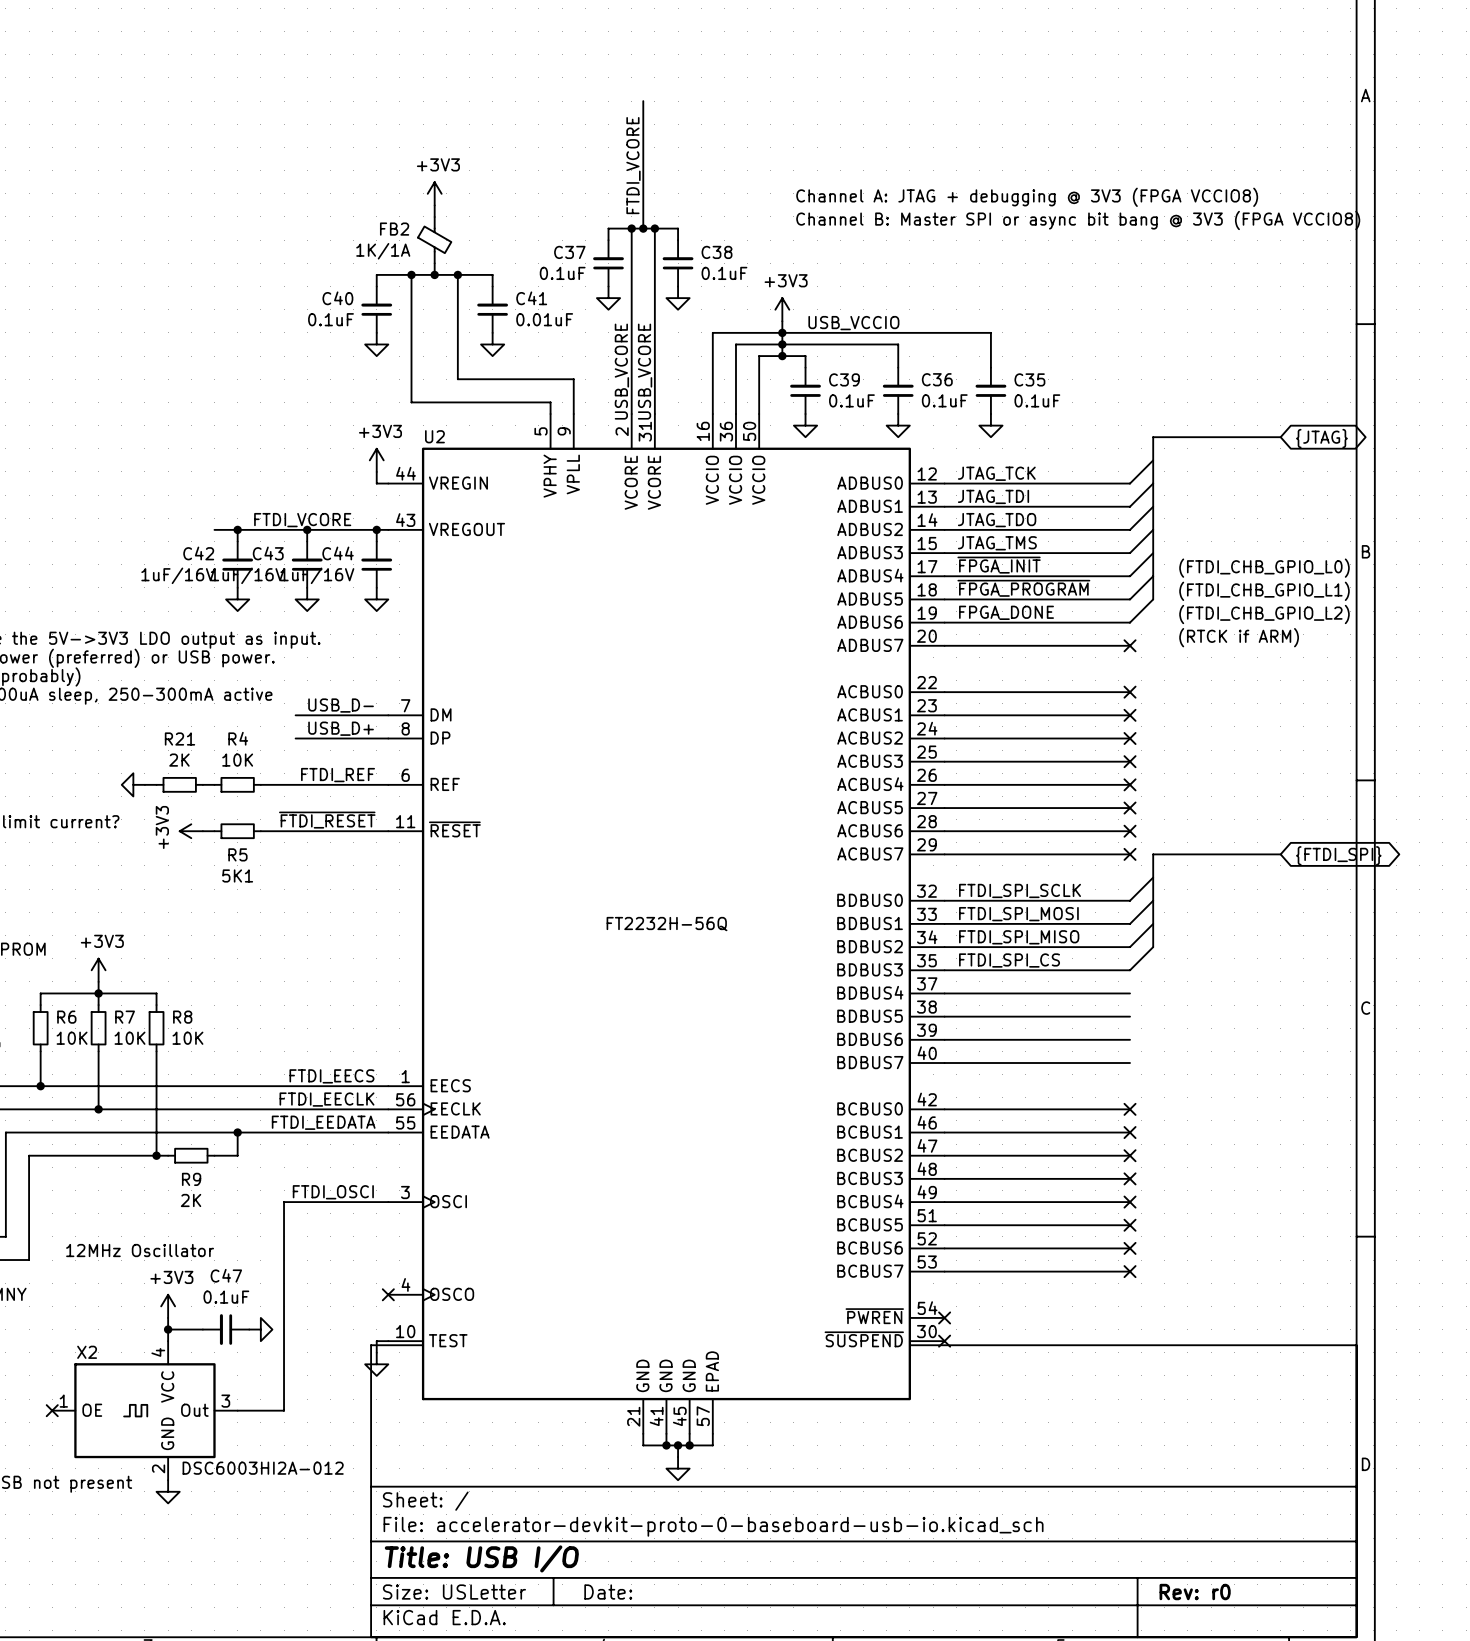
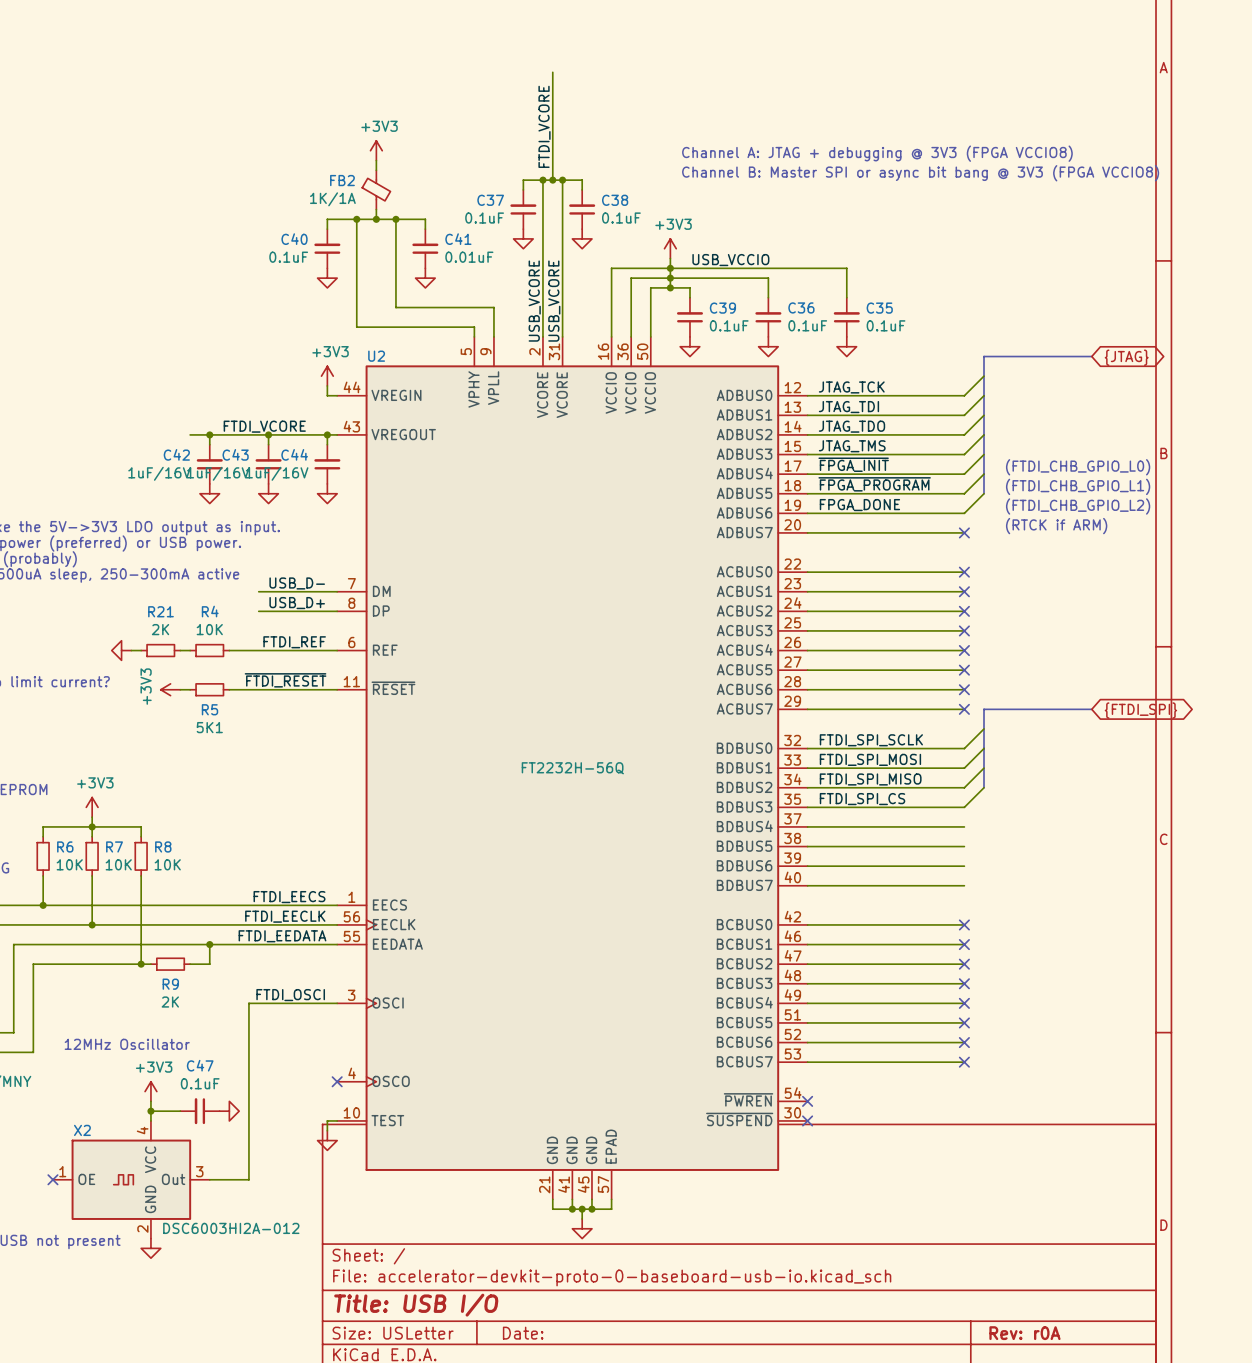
title block: Rev: r0 (1195, 1592) -> Rev: r0A (1024, 1333)

